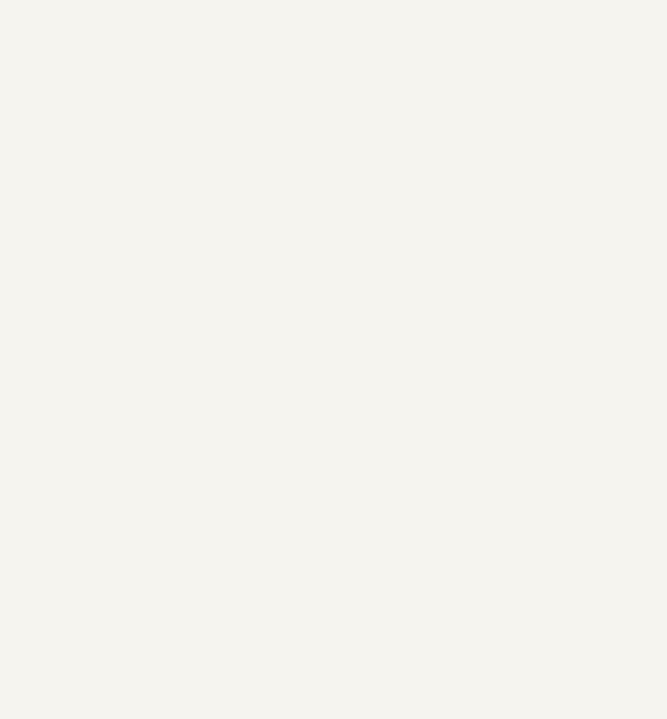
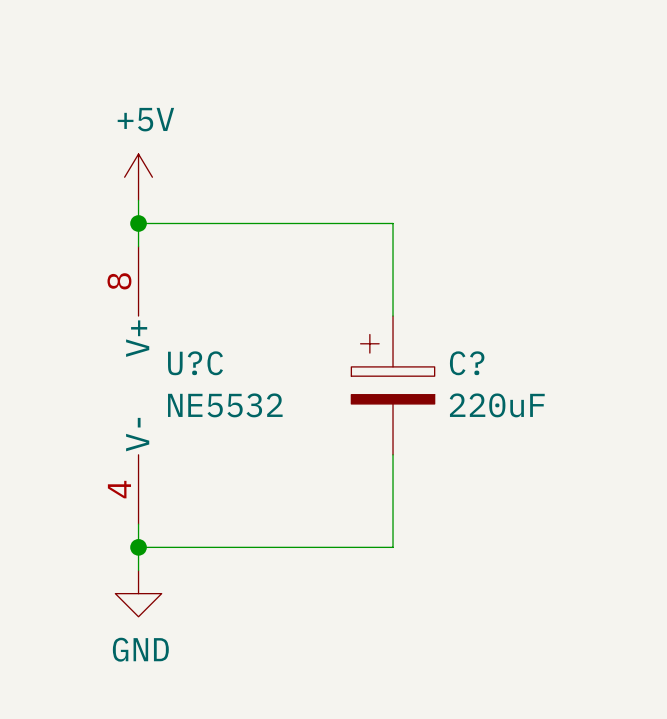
power symbol: none -> +5V (138, 177)
wire: none -> (138, 200) (138, 246)
wire: none -> (138, 223) (393, 223) (393, 316)
junction: none -> (138, 223)
U?C: none -> NE5532 (138, 385)
C?: none -> 220uF (393, 385)
wire: none -> (393, 454) (393, 547) (138, 547)
wire: none -> (138, 524) (138, 570)
junction: none -> (138, 547)
power symbol: none -> GND (138, 593)

